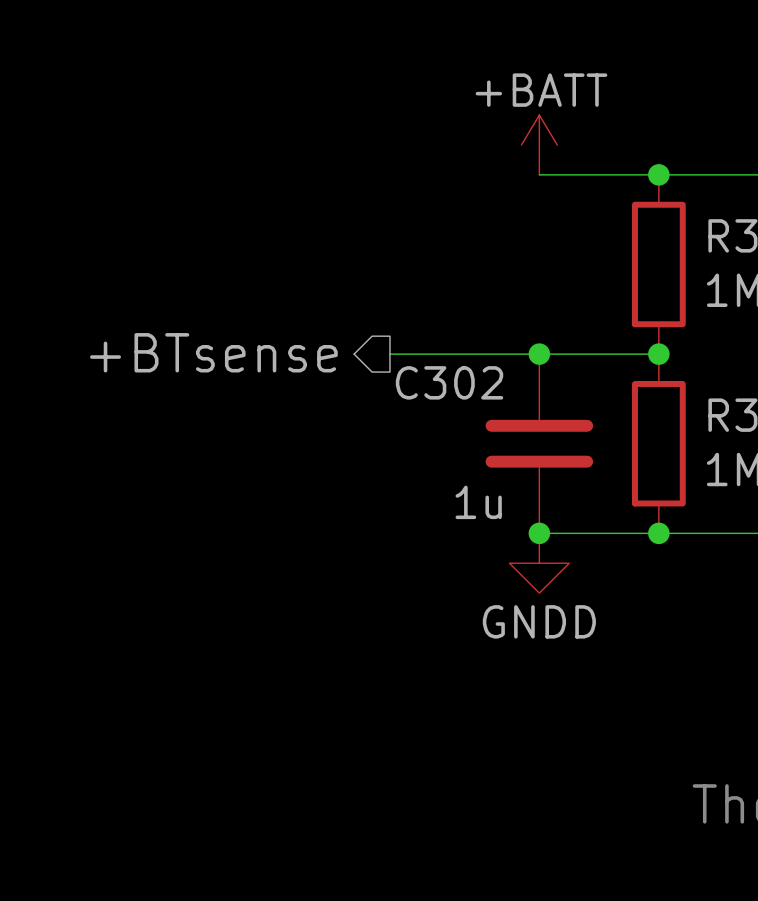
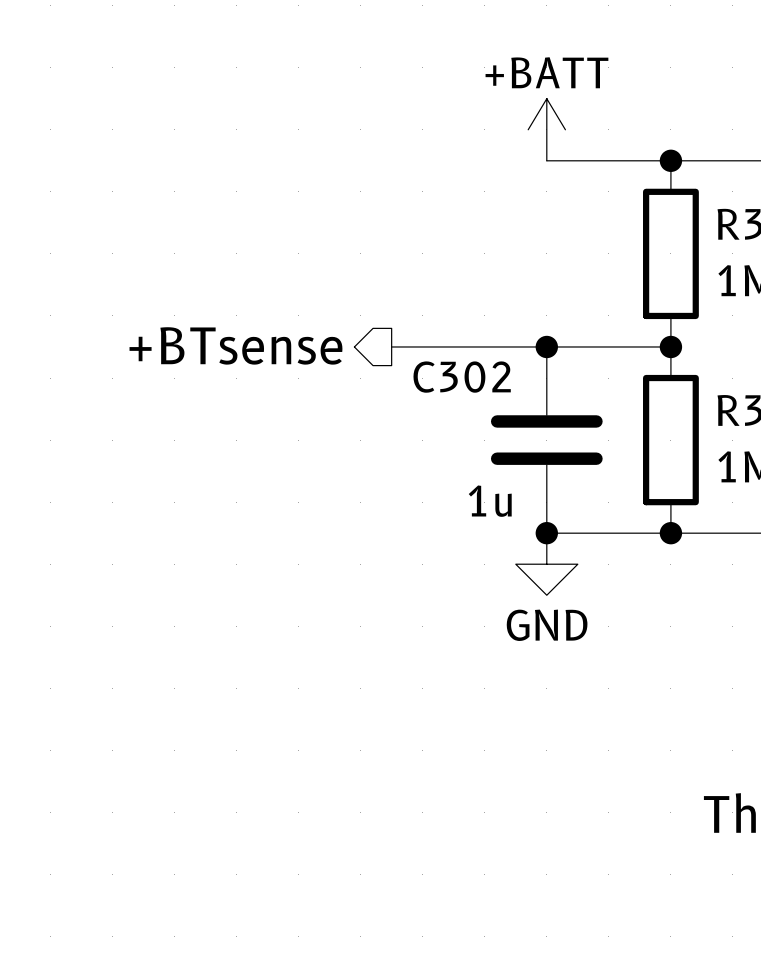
power symbol: GNDD (539, 563) -> GND (546, 564)

